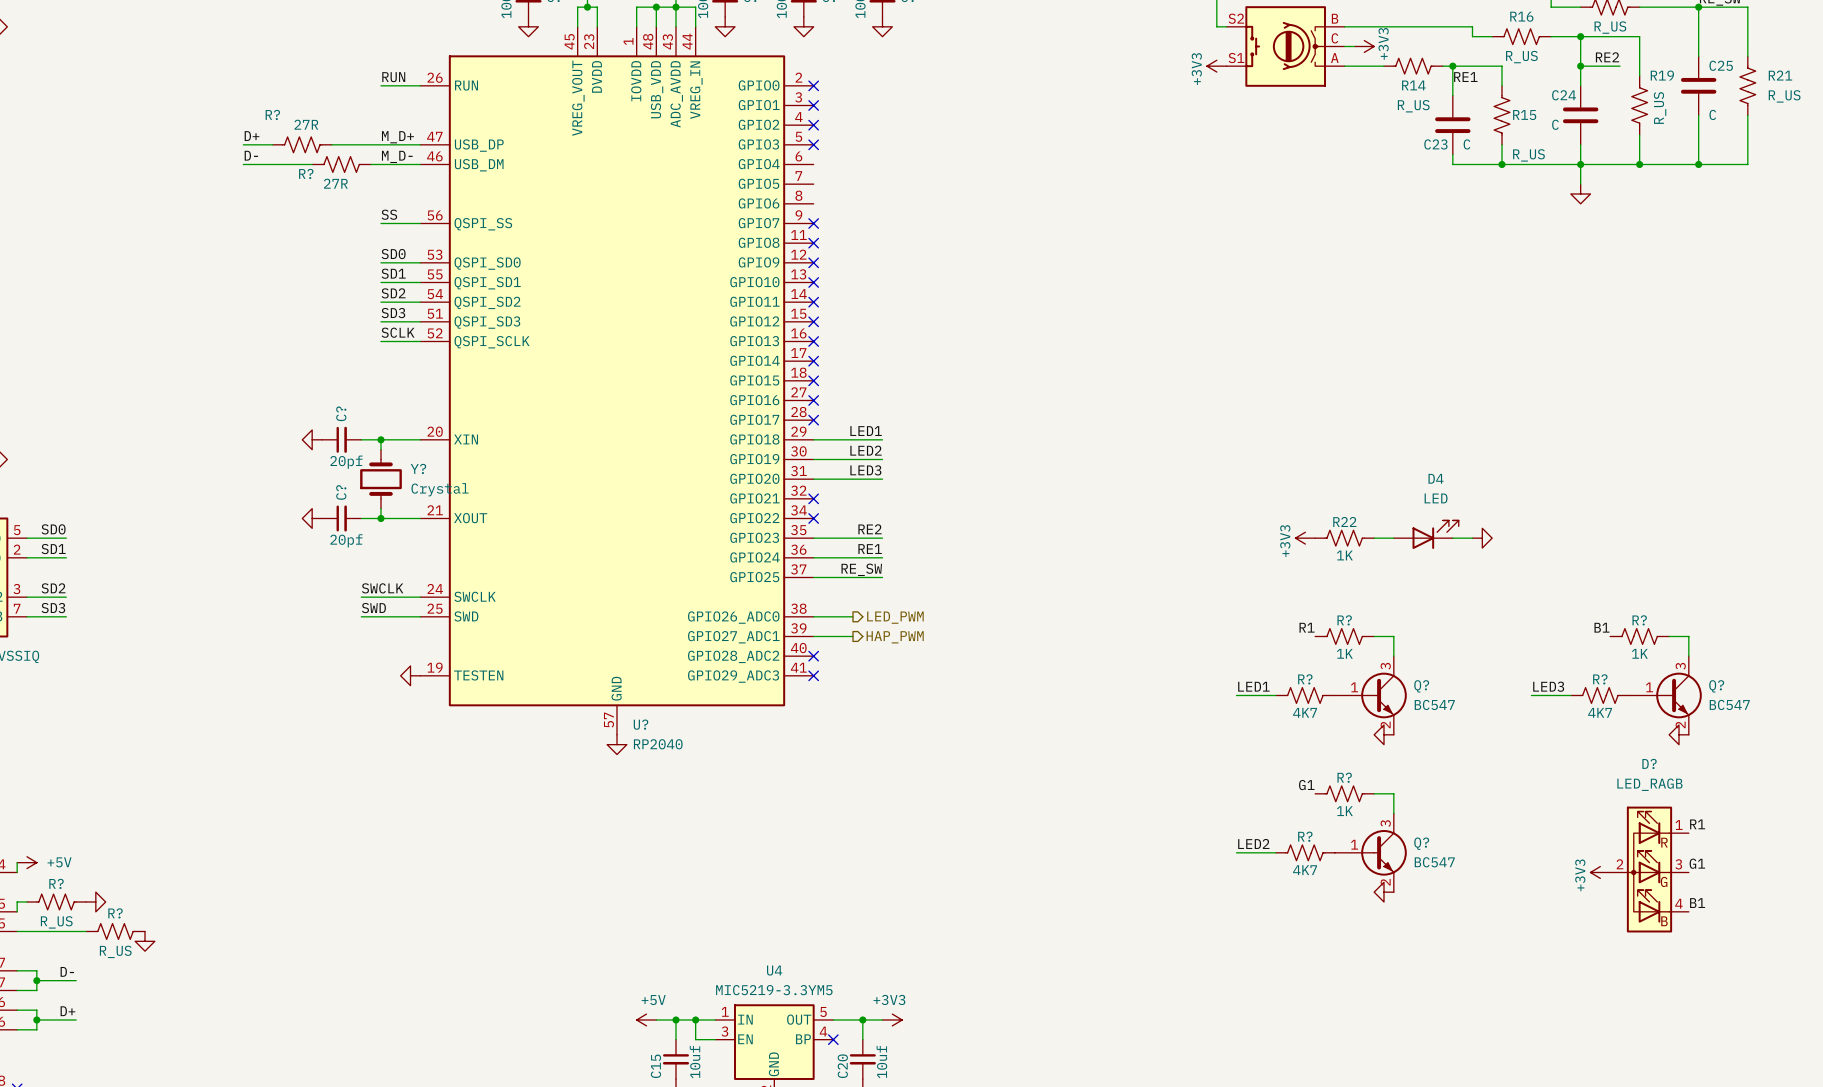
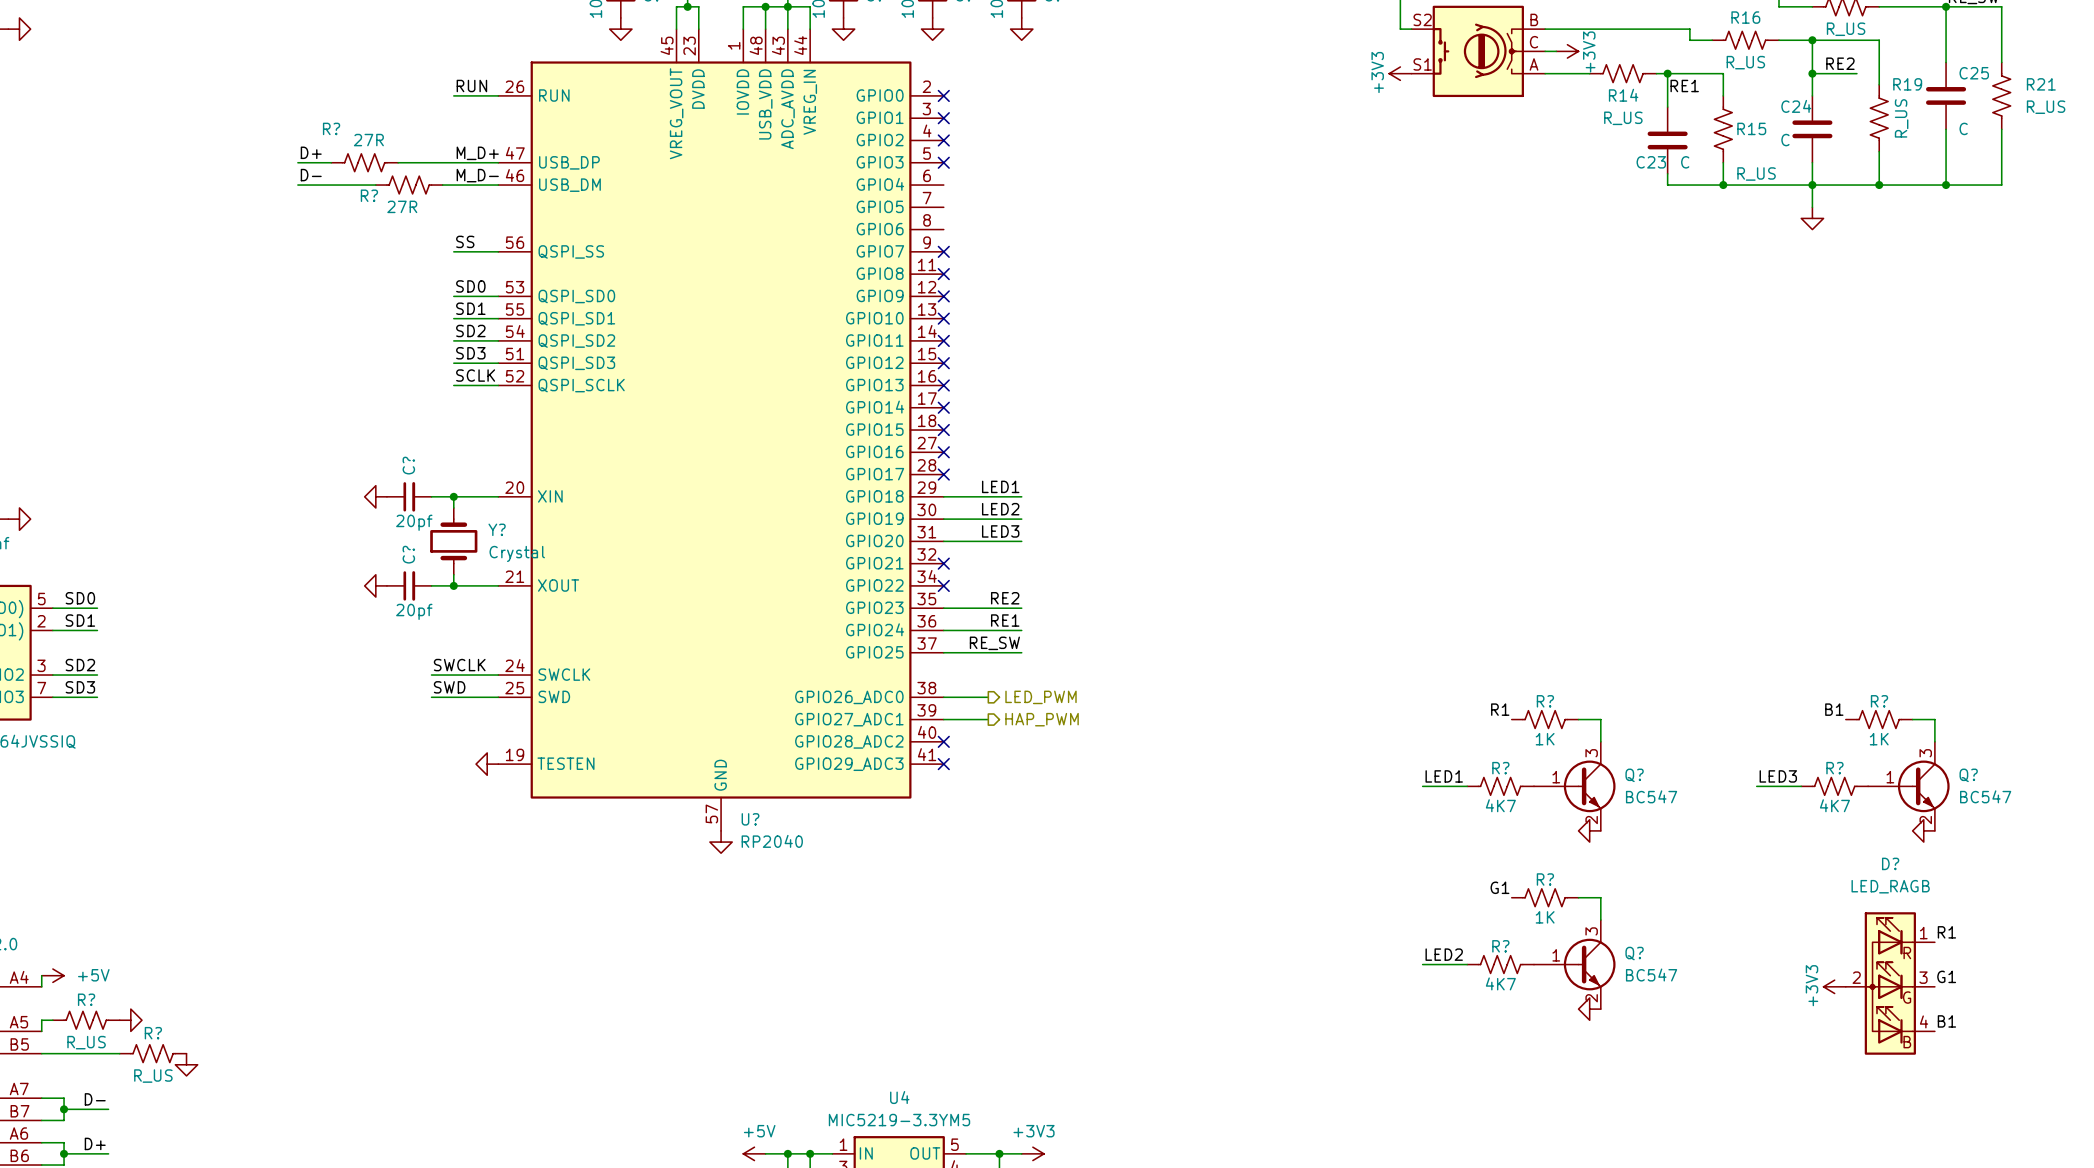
D4: LED (1426, 534) -> none
power symbol: +3V3 (1305, 538) -> none
R22: 1K (1344, 538) -> none
wire: (1374, 538) (1393, 538) -> none
wire: (1452, 538) (1472, 538) -> none
power symbol: (1482, 538) -> none

